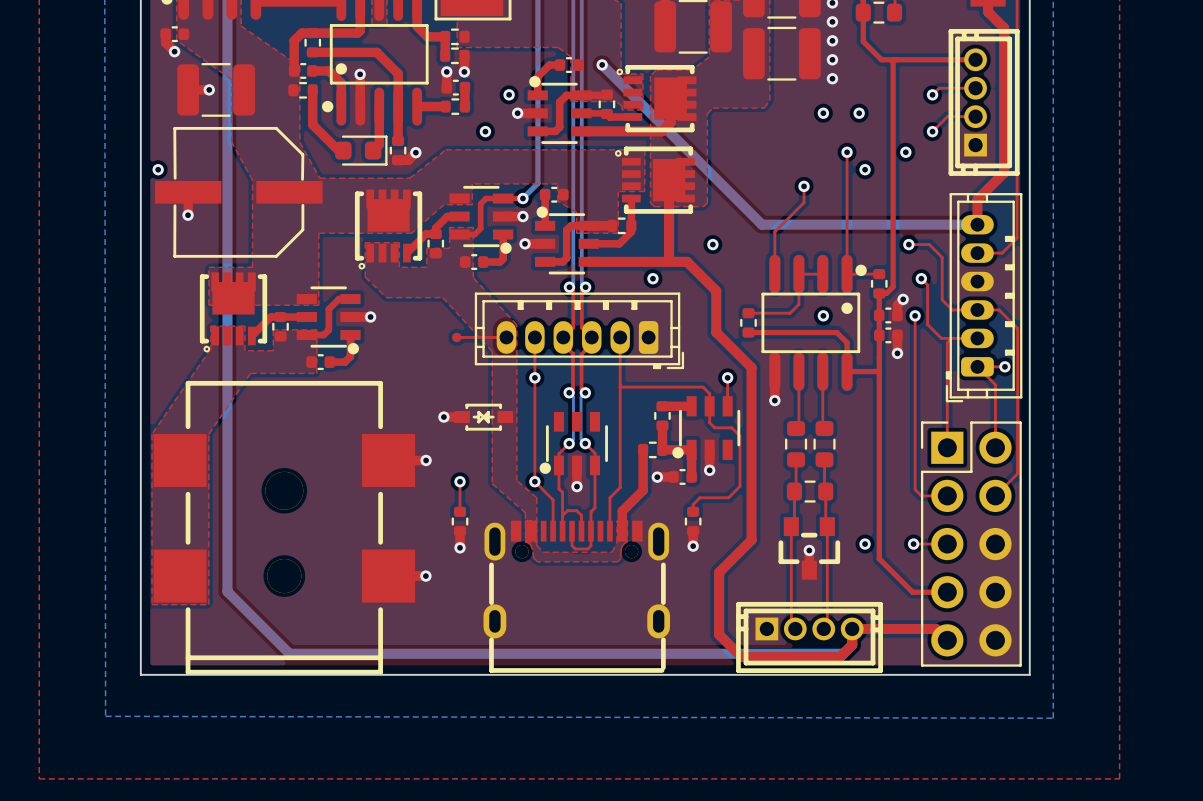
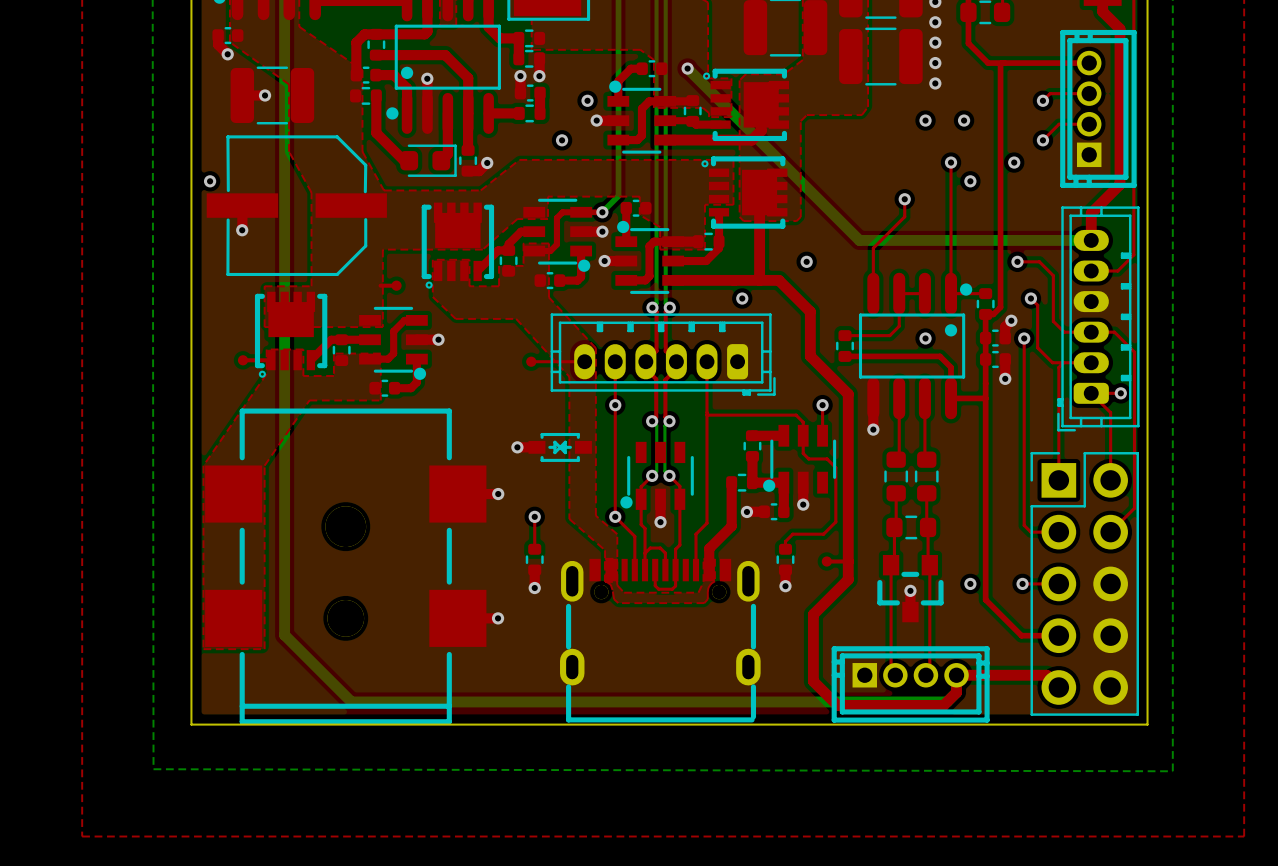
top track: none -> (380, 285) (396, 285)
part: none -> (396, 285)
top track: none -> (243, 360) (271, 360)
part: none -> (243, 360)
top track: none -> (826, 561) (848, 561)
part: none -> (826, 561)

